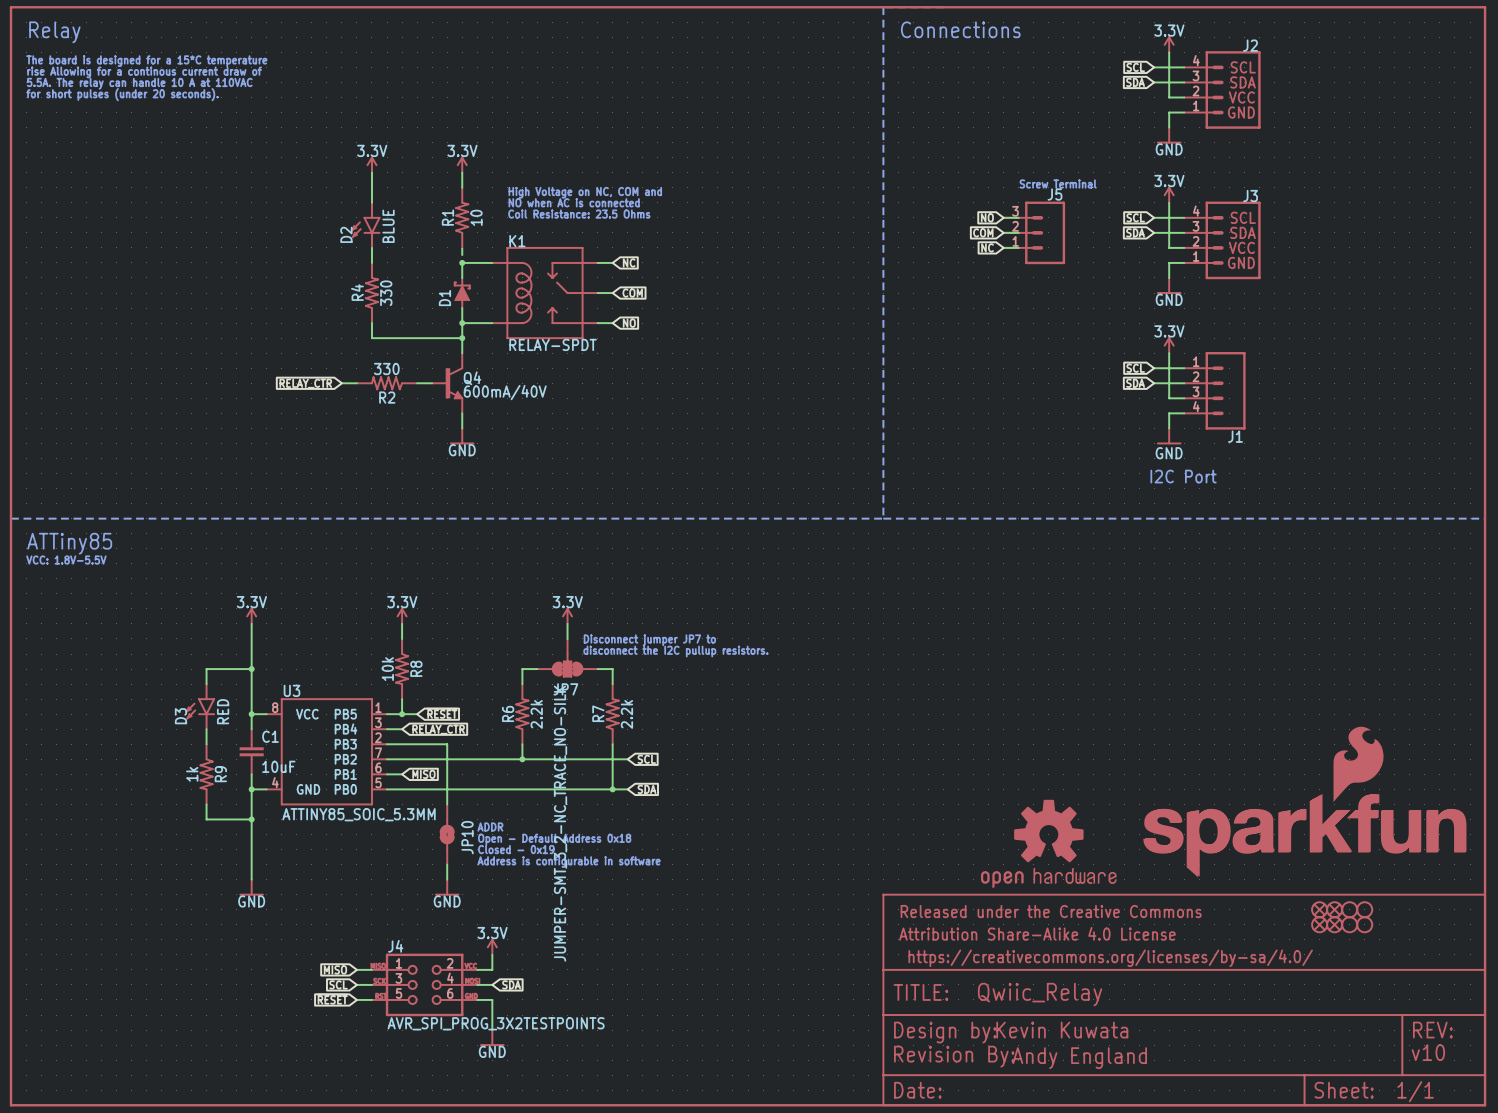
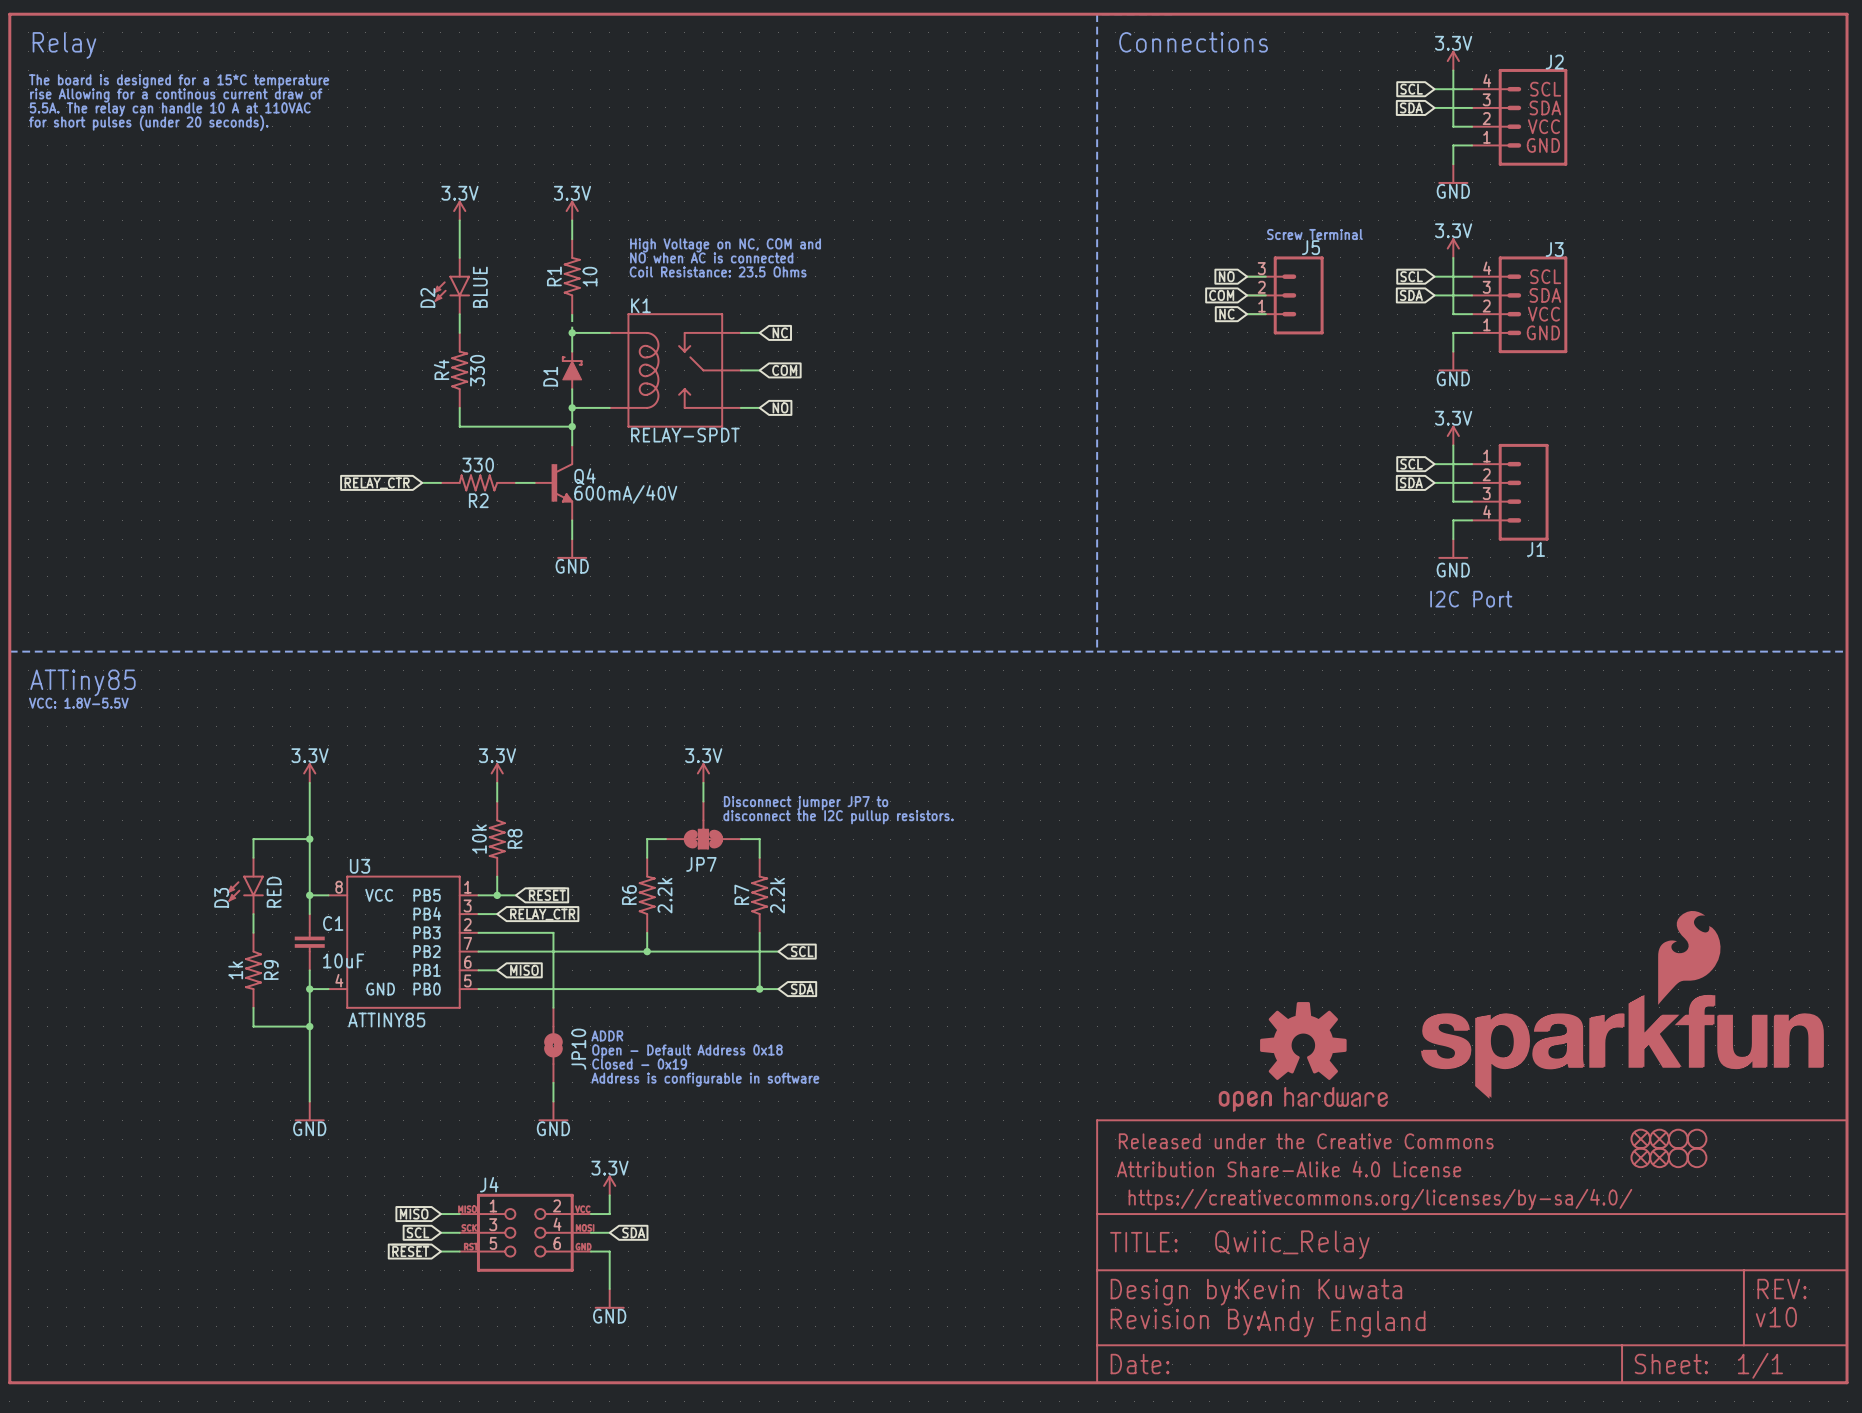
U3 value: ATTINY85_SOIC_5.3MM (359, 814) -> ATTINY85 (386, 1020)
JP7 value: JUMPER-SMT_3_2-NC_TRACE_NO-SILK (560, 823) -> none
J4 value: AVR_SPI_PROG_3X2TESTPOINTS (496, 1023) -> none

